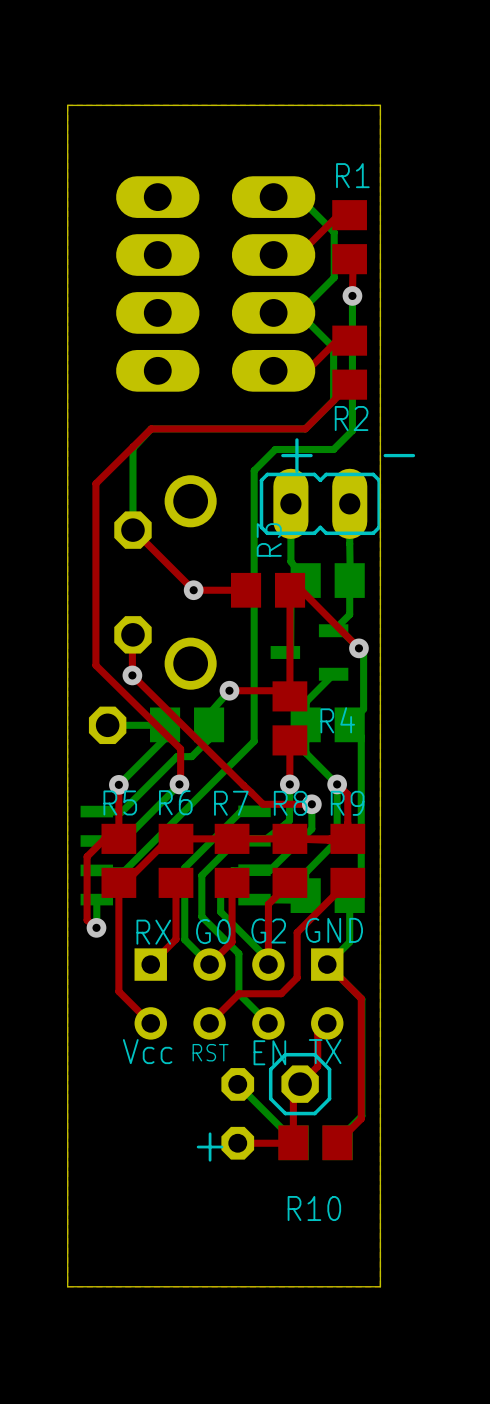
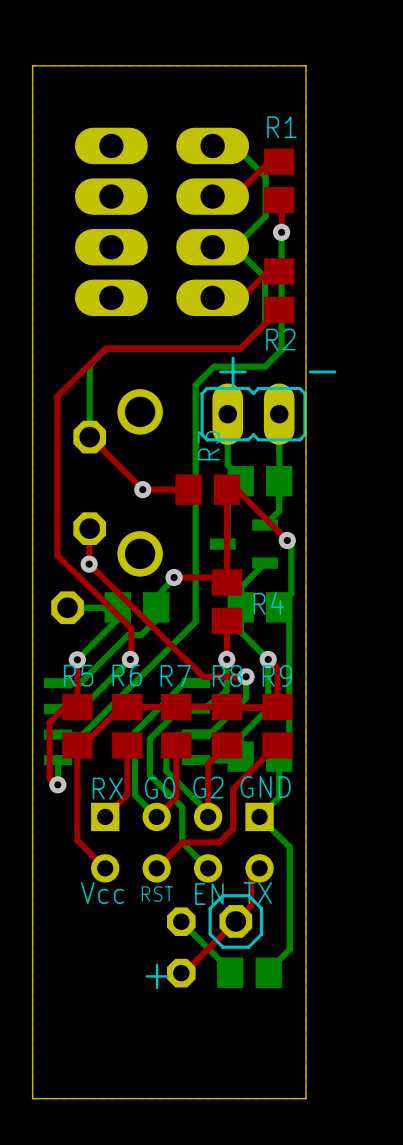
top track: (327, 964) (361, 998) (361, 1118) (337, 1142) -> none
top track: (293, 1090) (292, 1143) (241, 1143) -> (229, 927) (184, 973)
R10: (315, 1142) -> none

